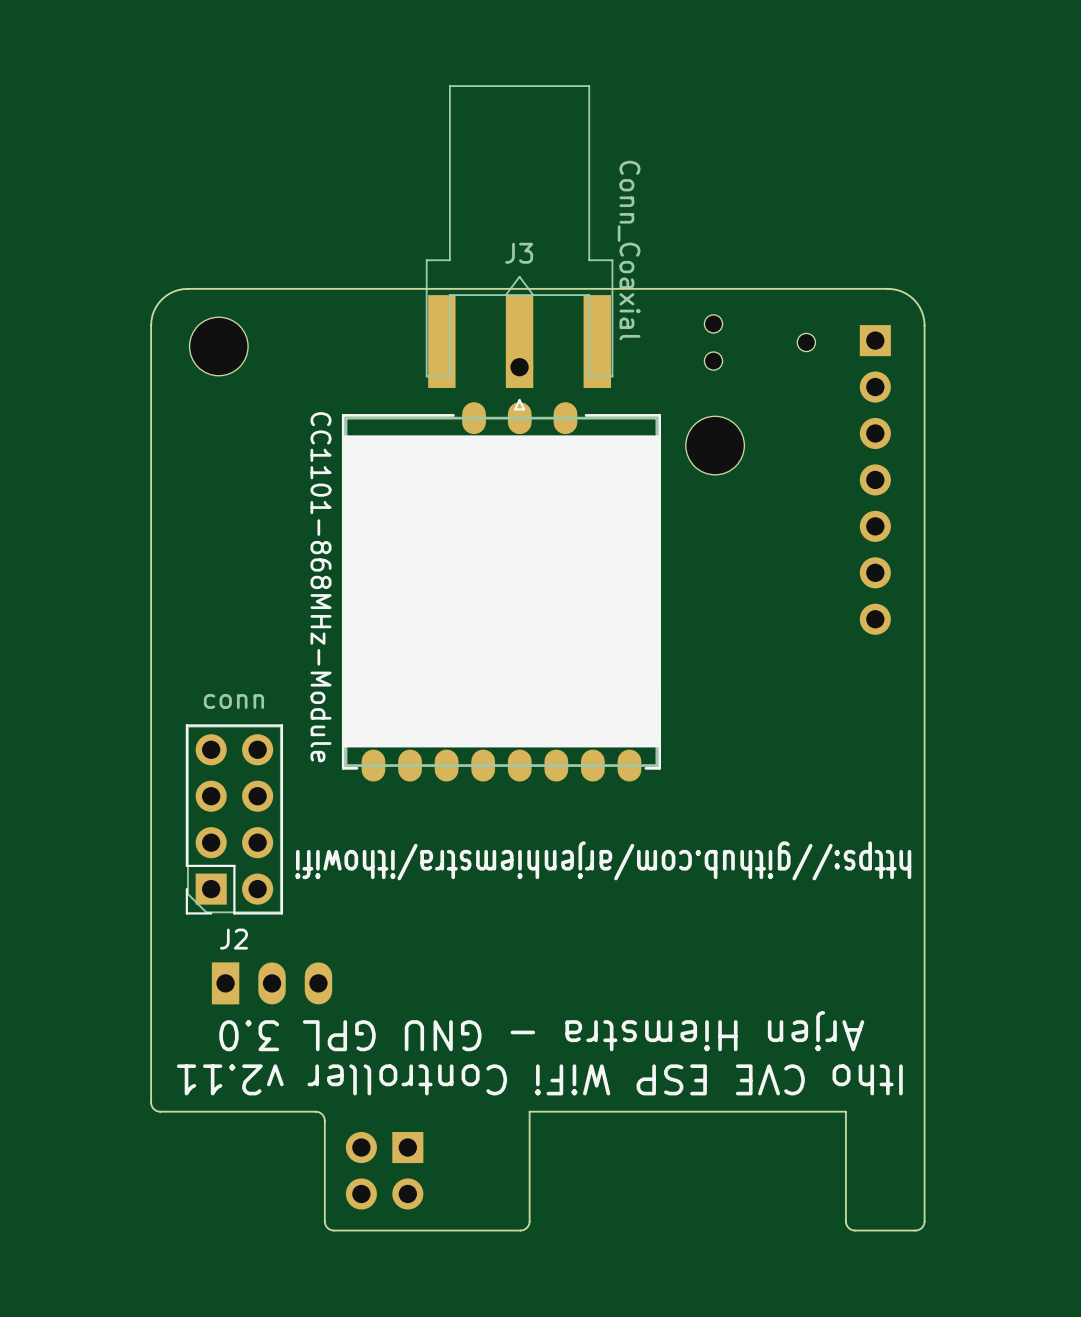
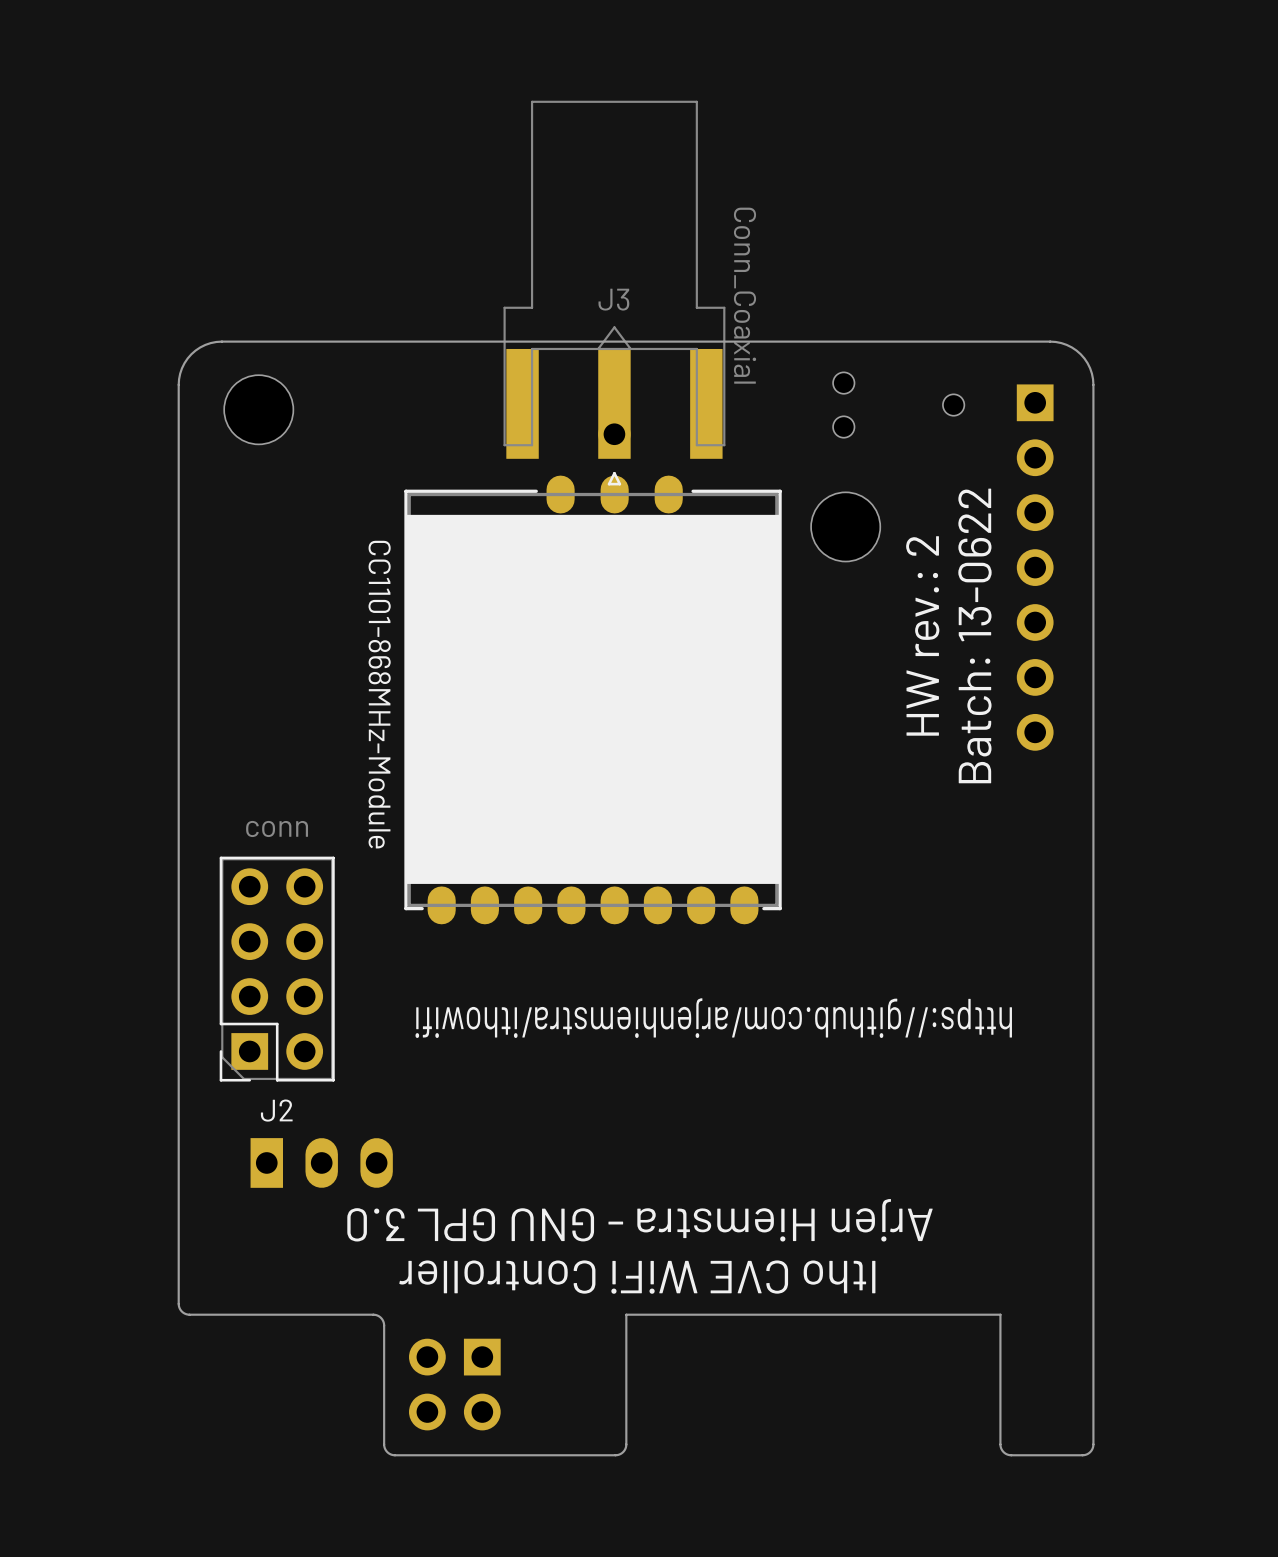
text: none -> HW rev.: 2 (922, 635)
text: none -> Batch: 13-0622 (974, 635)
text: Itho CVE ESP WiFi Controller v2.11 (539, 1079) -> Itho CVE WiFi Controller (637, 1277)

